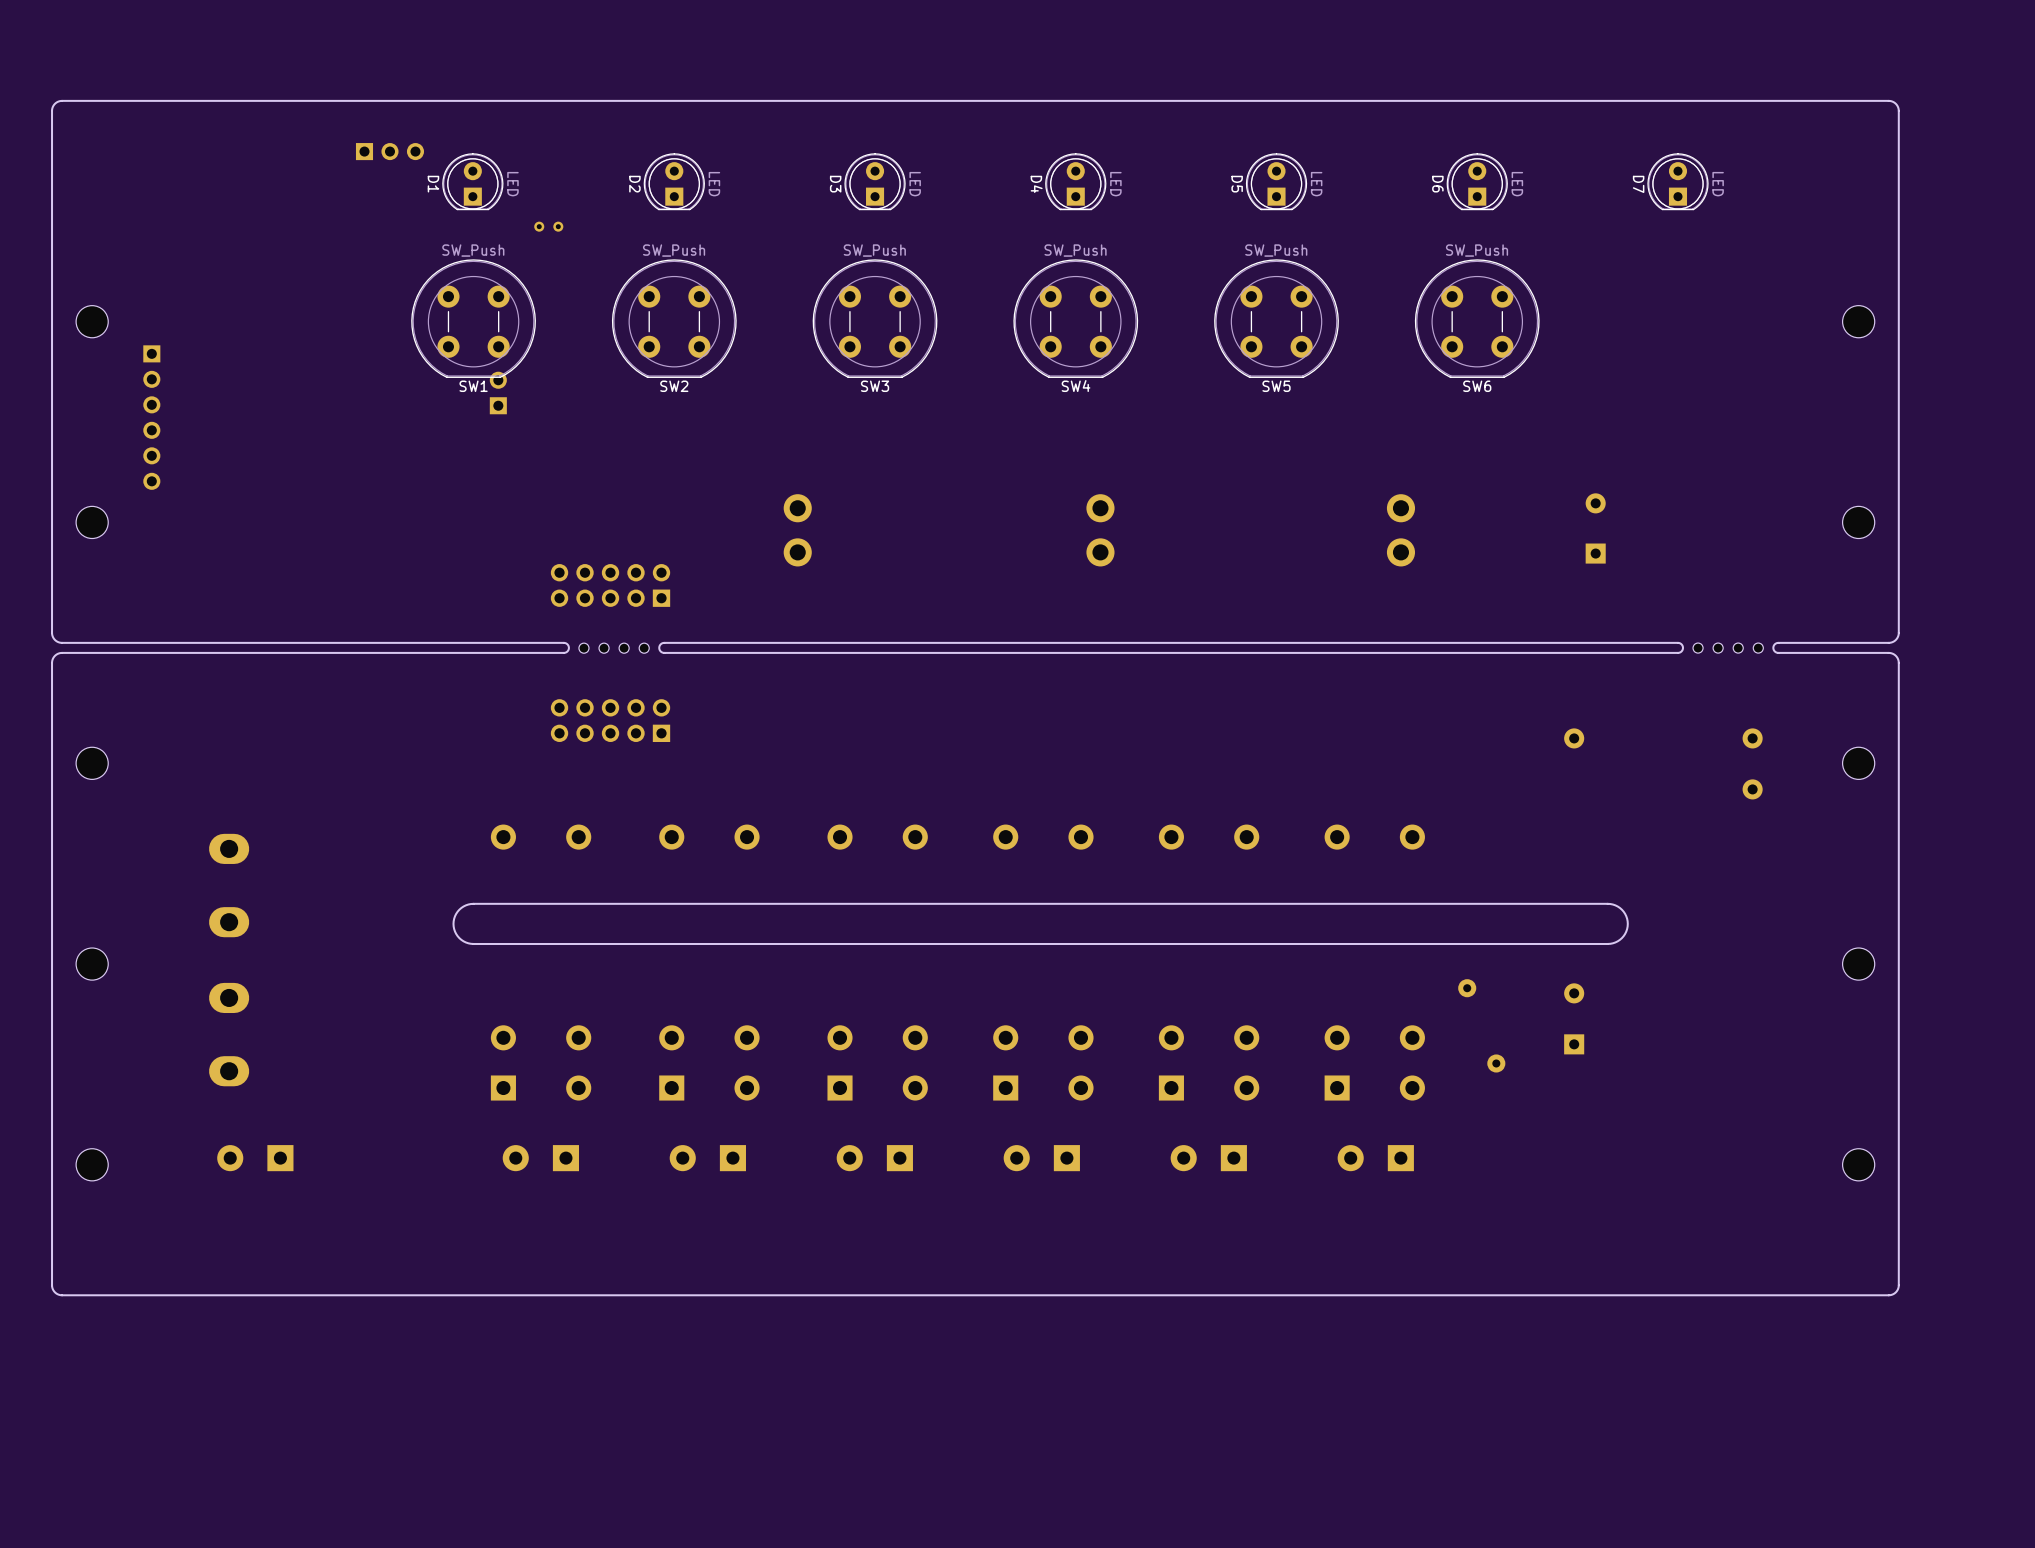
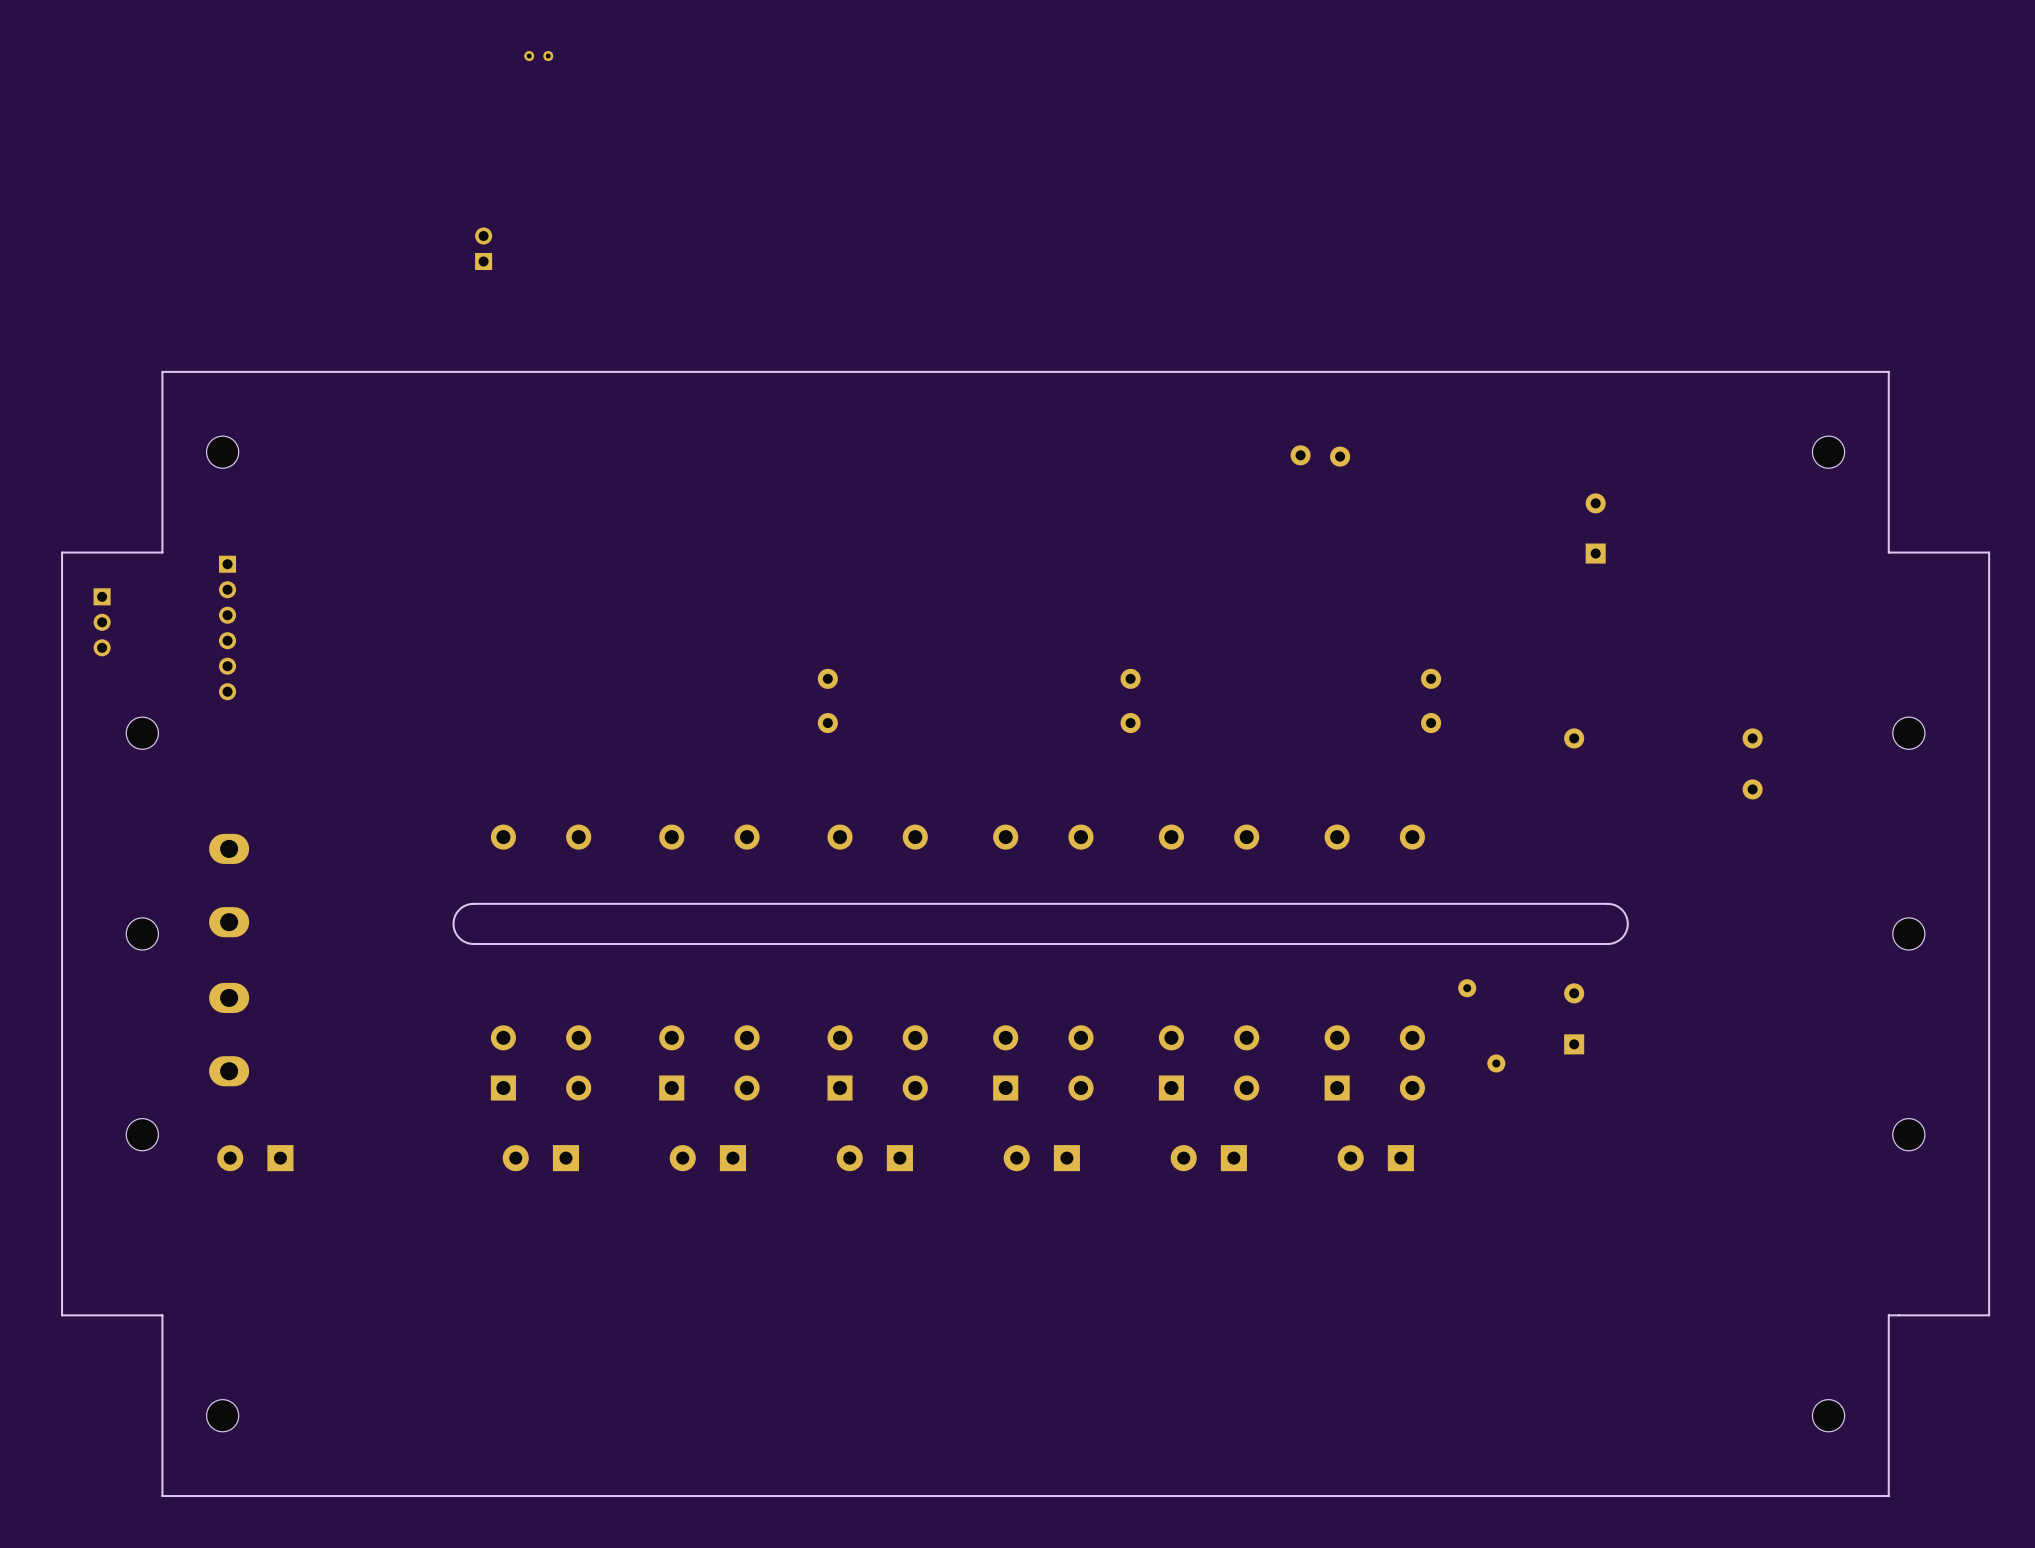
board edge: (1888, 100) (57, 102) (52, 110) (52, 632) (54, 639) (62, 642) (563, 642) (568, 647) (563, 652) (62, 652) (54, 656) (52, 662) (53, 1290) (62, 1295) (1893, 1293) (1898, 1285) (1898, 661) (1895, 655) (1890, 653) (1778, 652) (1773, 647) (1778, 642) (1890, 642) (1895, 639) (1898, 635) (1898, 110) (1895, 103) (1888, 100) -> (1888, 371) (1888, 552) (1989, 552) (1989, 1315) (1888, 1315) (1888, 1496) (162, 1496) (162, 1315) (62, 1315) (62, 552) (162, 552) (162, 371) (1888, 371)
part: (389, 151) -> none
D1: LED (472, 181) -> none
D2: LED (674, 181) -> none
D3: LED (875, 181) -> none
D4: LED (1075, 181) -> none
D5: LED (1276, 181) -> none
D6: LED (1477, 181) -> none
D7: LED (1677, 181) -> none
part position: (548, 226) -> (538, 56)
SW1: SW_Push (473, 318) -> none
SW2: SW_Push (674, 318) -> none
SW3: SW_Push (875, 318) -> none
SW4: SW_Push (1075, 318) -> none
SW5: SW_Push (1276, 318) -> none
SW6: SW_Push (1477, 318) -> none
part: (92, 321) -> none
part: (1858, 321) -> none
part position: (498, 392) -> (483, 248)
part position: (151, 417) -> (227, 627)
part: none -> (222, 452)
part: none -> (1828, 452)
part: none -> (1300, 455)
part: none -> (1340, 456)
part: (797, 508) -> none
part: (1100, 508) -> none
part: (1400, 508) -> none
part: (92, 522) -> none
part: (1858, 522) -> none
part: (797, 552) -> none
part: (1100, 552) -> none
part: (1400, 552) -> none
part: (610, 585) -> none
part: none -> (102, 622)
board edge: (1677, 642) (664, 642) (659, 647) (664, 652) (1677, 652) (1683, 647) (1677, 642) -> none
part: (583, 648) -> none
part: (604, 648) -> none
part: (624, 648) -> none
part: (644, 648) -> none
part: (1698, 648) -> none
part: (1718, 648) -> none
part: (1738, 648) -> none
part: (1758, 648) -> none
part: none -> (827, 678)
part: none -> (1130, 678)
part: none -> (1431, 678)
part: (610, 720) -> none
part: none -> (827, 723)
part: none -> (1130, 723)
part: none -> (1431, 723)
part position: (92, 763) -> (142, 733)
part position: (1858, 763) -> (1908, 733)
part position: (92, 964) -> (142, 933)
part position: (1858, 964) -> (1908, 933)
part position: (92, 1164) -> (142, 1134)
part position: (1858, 1164) -> (1908, 1134)
part: none -> (222, 1415)
part: none -> (1828, 1415)

